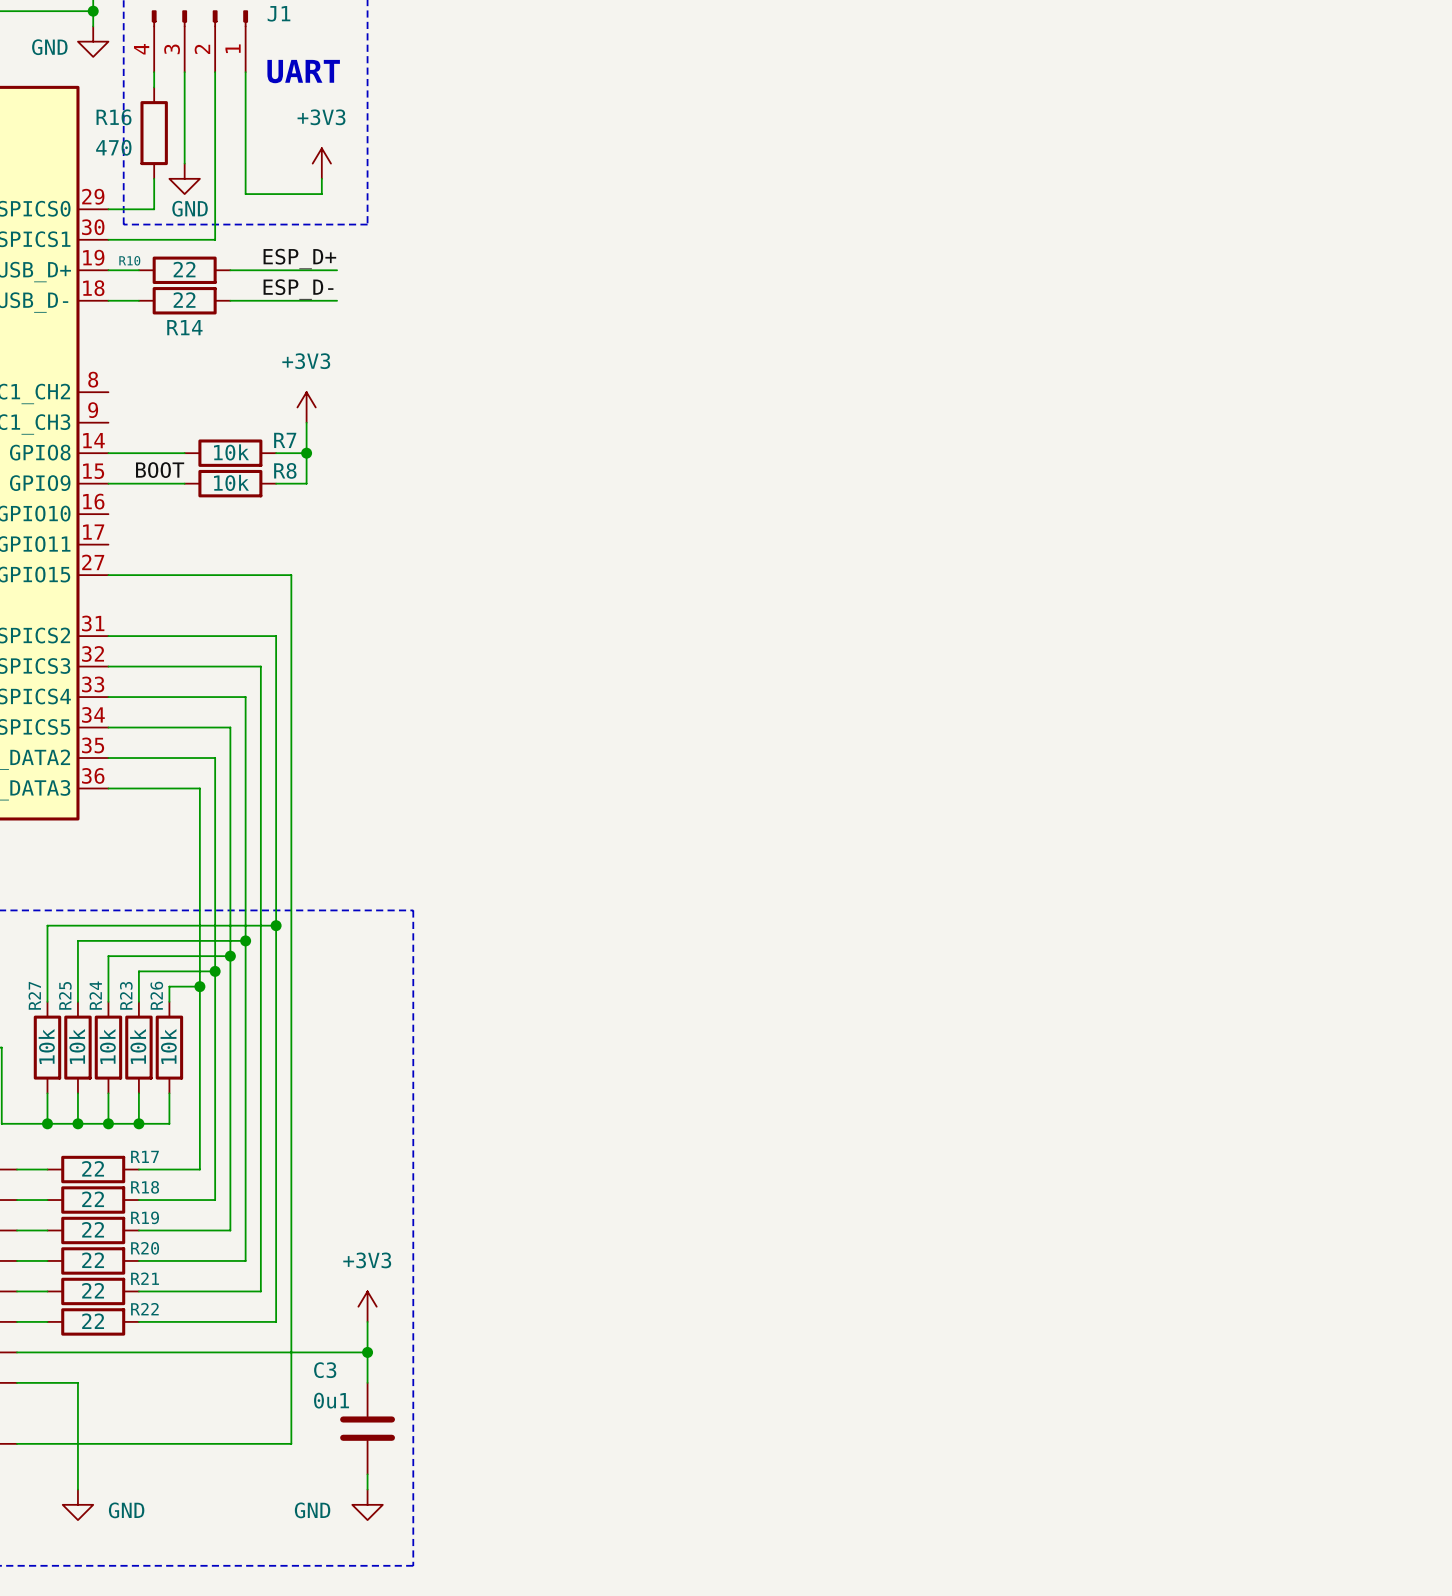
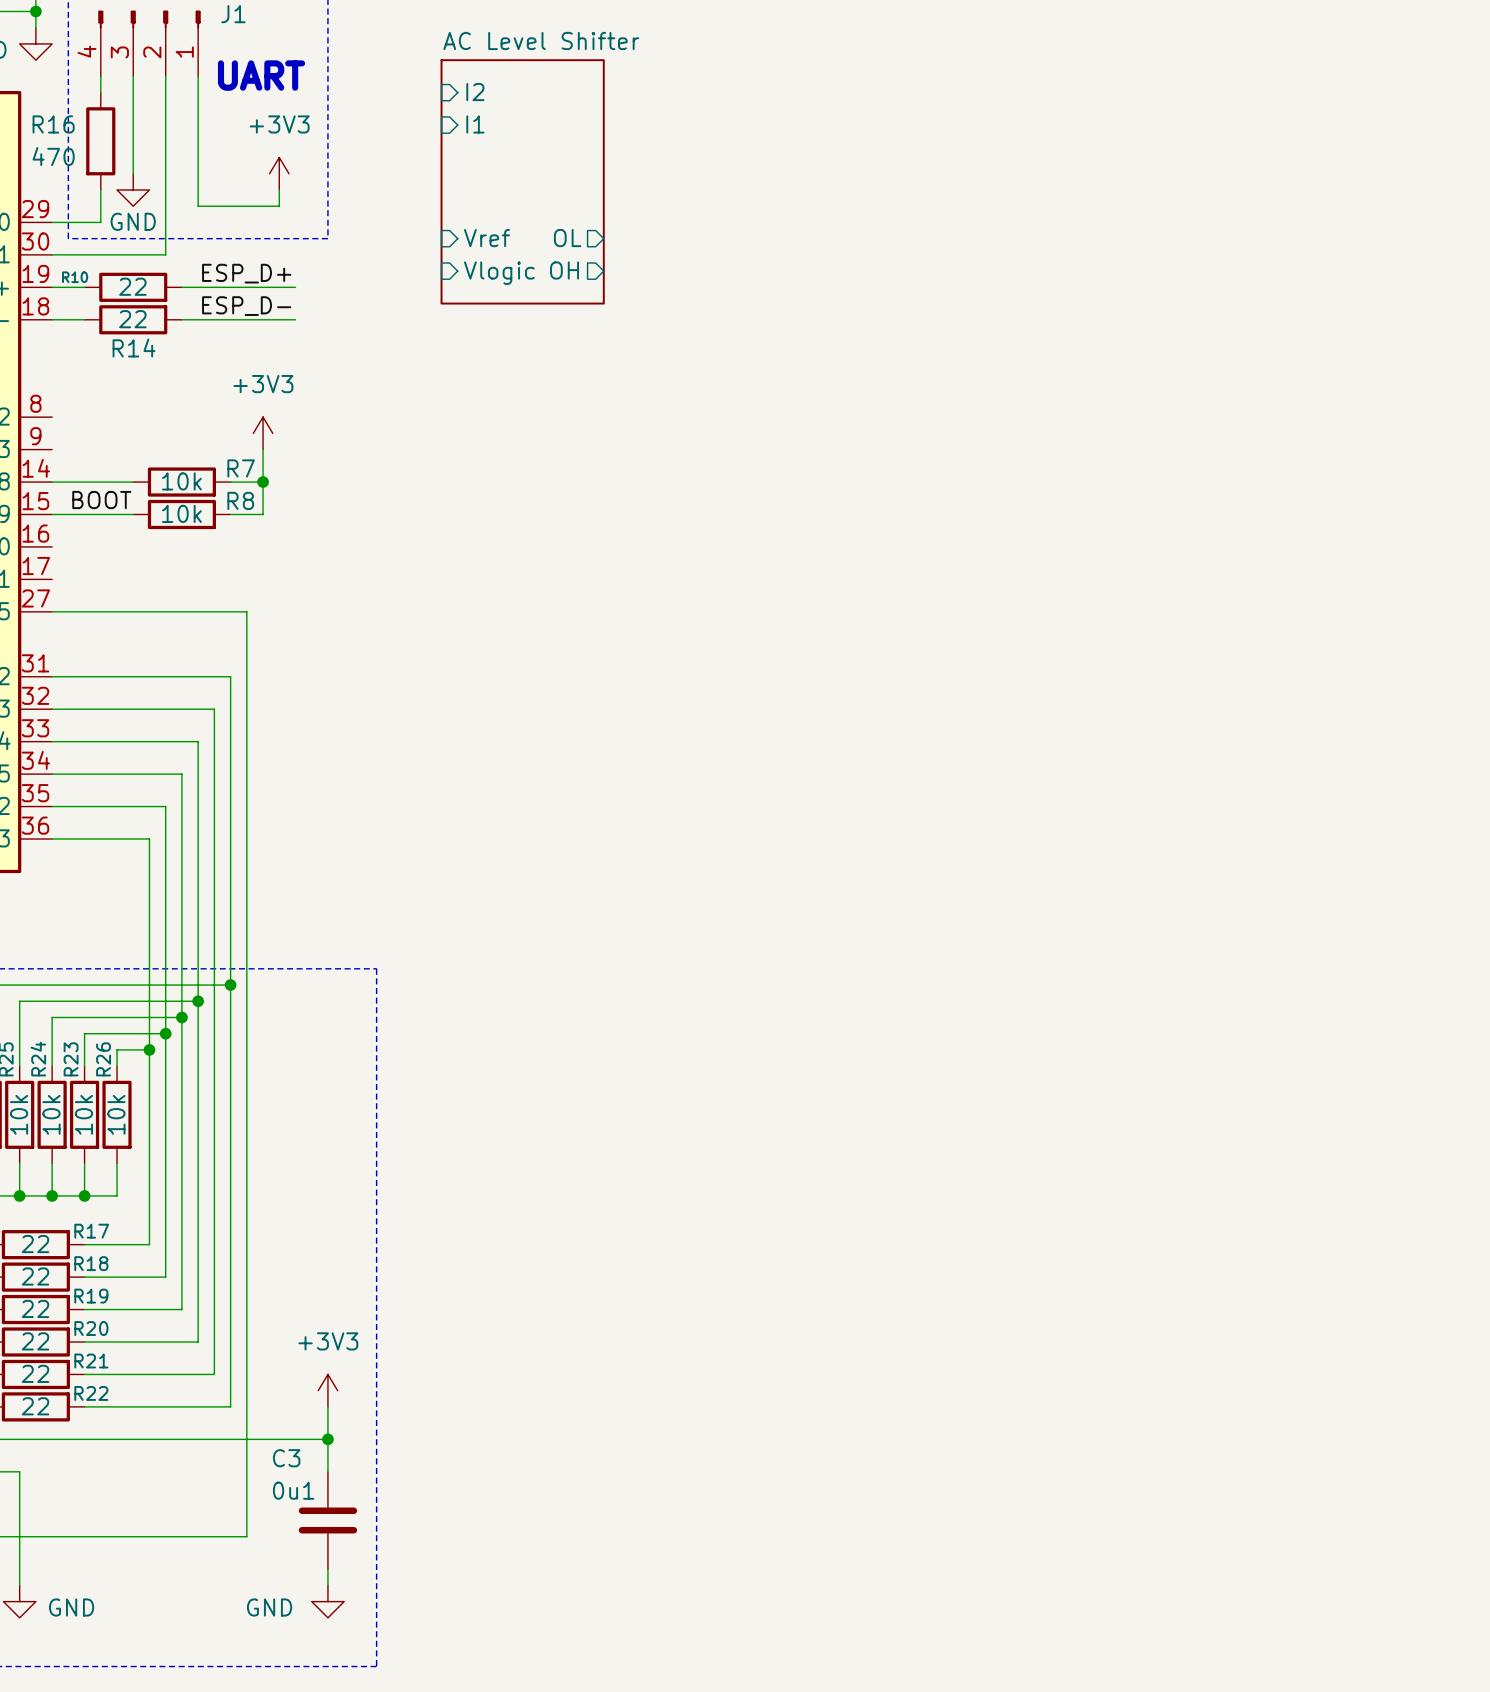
sheet pin: none -> I2 (475, 92)
sheet pin: none -> I1 (475, 124)
sheet AC Level Shifter: none -> (522, 181)
sheet pin: none -> Vref (486, 238)
sheet pin: none -> OL (567, 238)
sheet pin: none -> OH (564, 270)
sheet pin: none -> Vlogic (499, 273)

